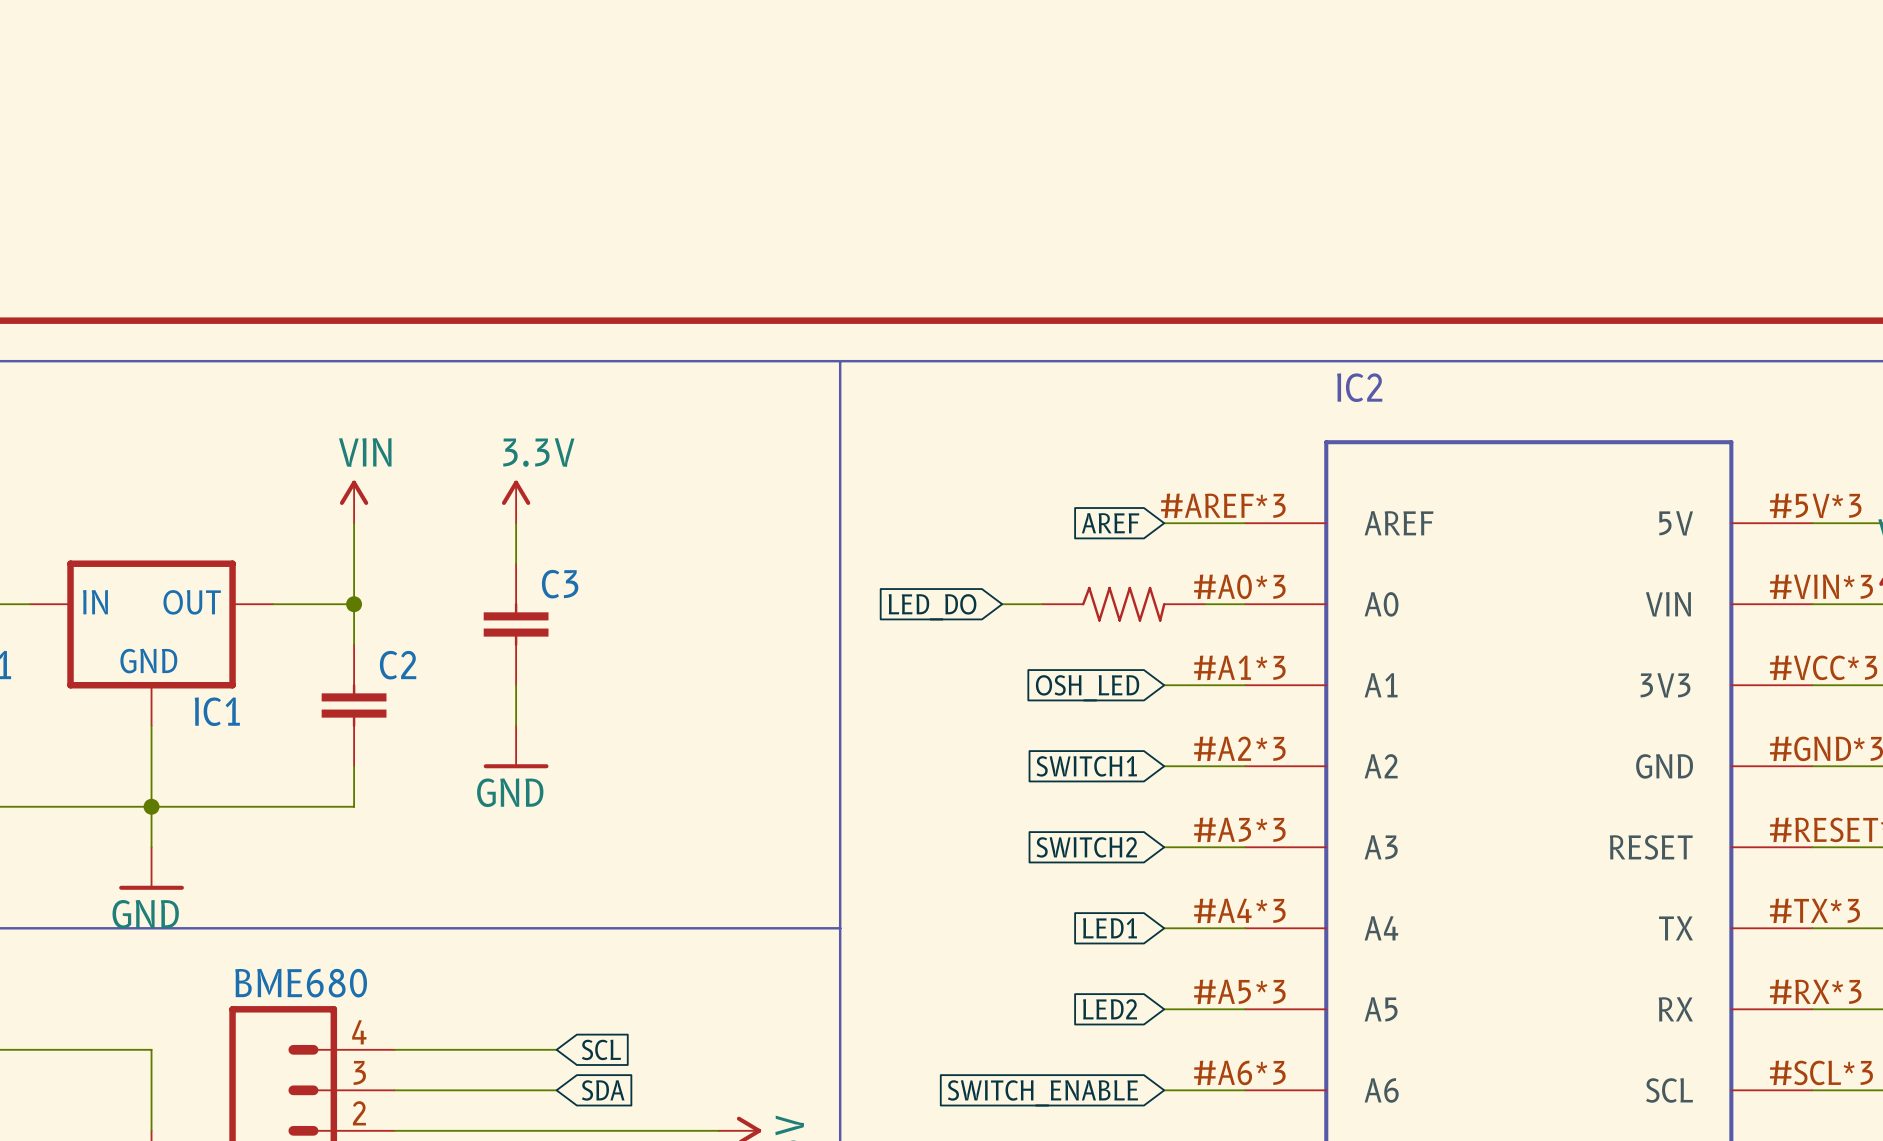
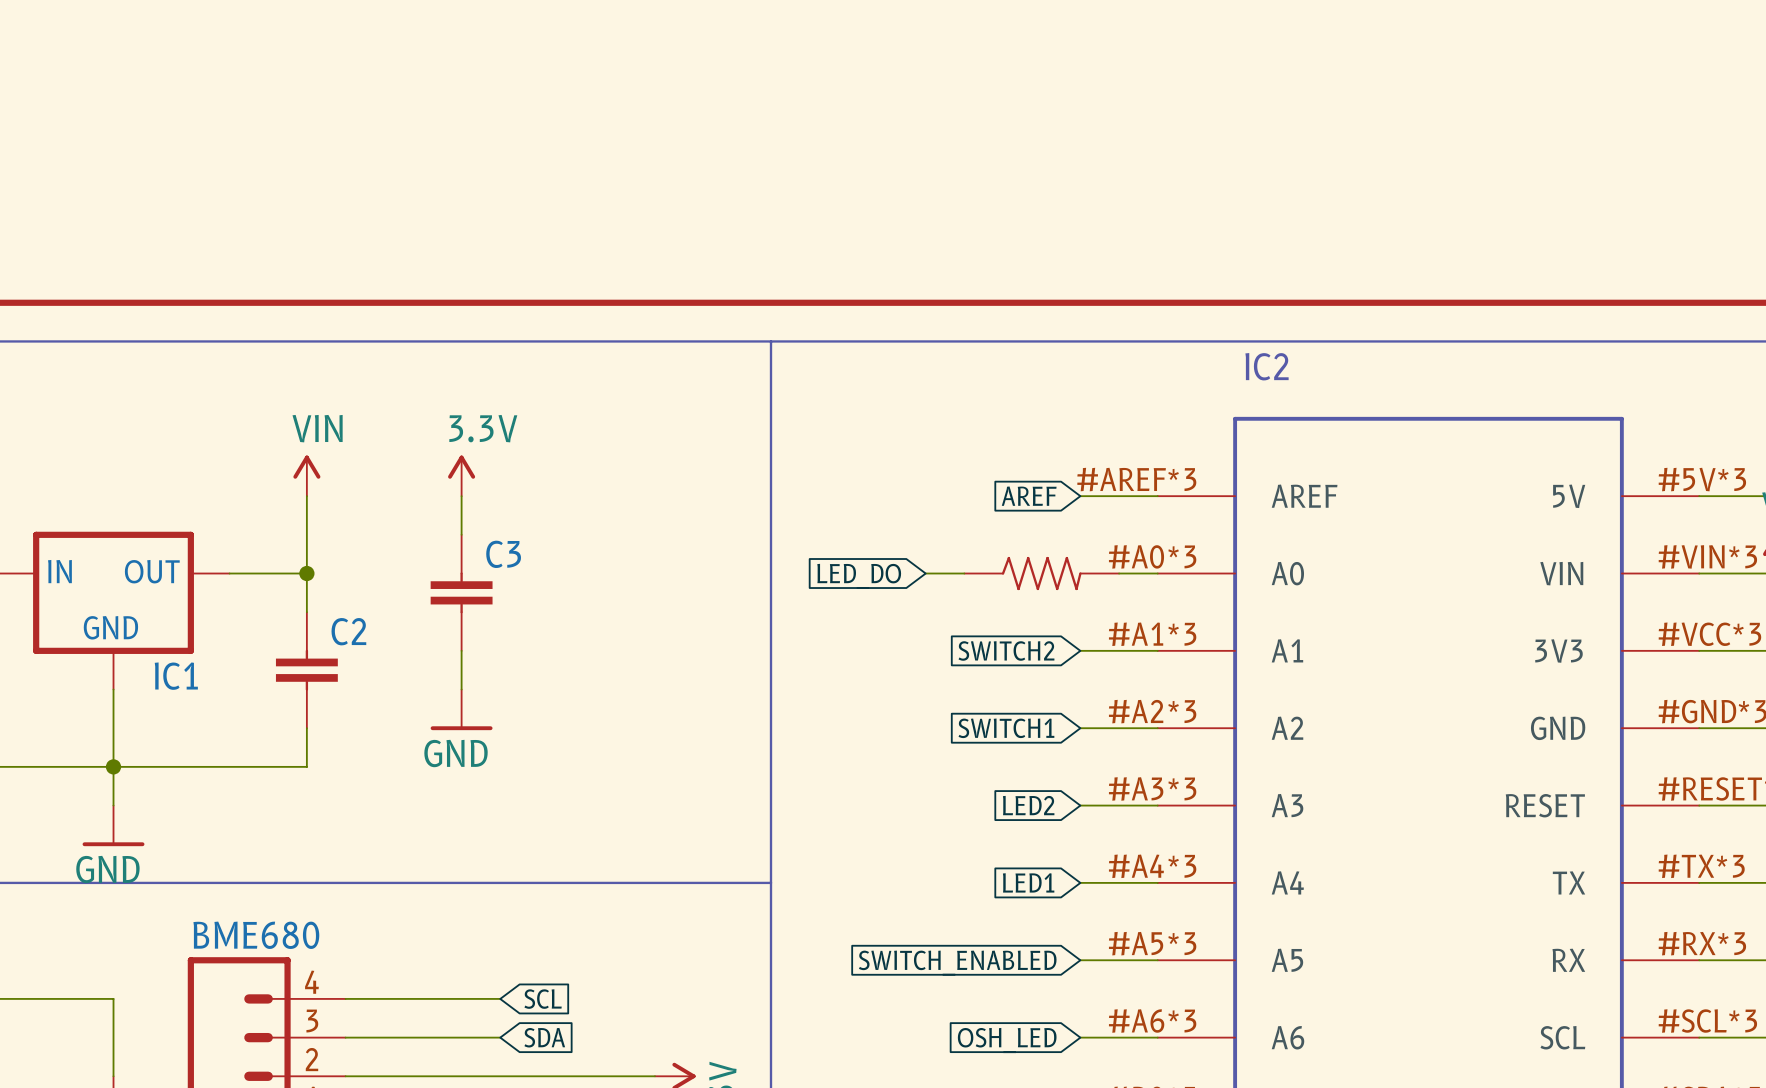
global label: OSH_LED (1087, 688) -> SWITCH2 (1006, 650)
global label: SWITCH2 (1086, 847) -> LED2 (1028, 805)
global label: LED2 (1110, 1009) -> SWITCH_ENABLED (957, 963)
global label: SWITCH_ENABLE (1042, 1093) -> OSH_LED (1007, 1040)

